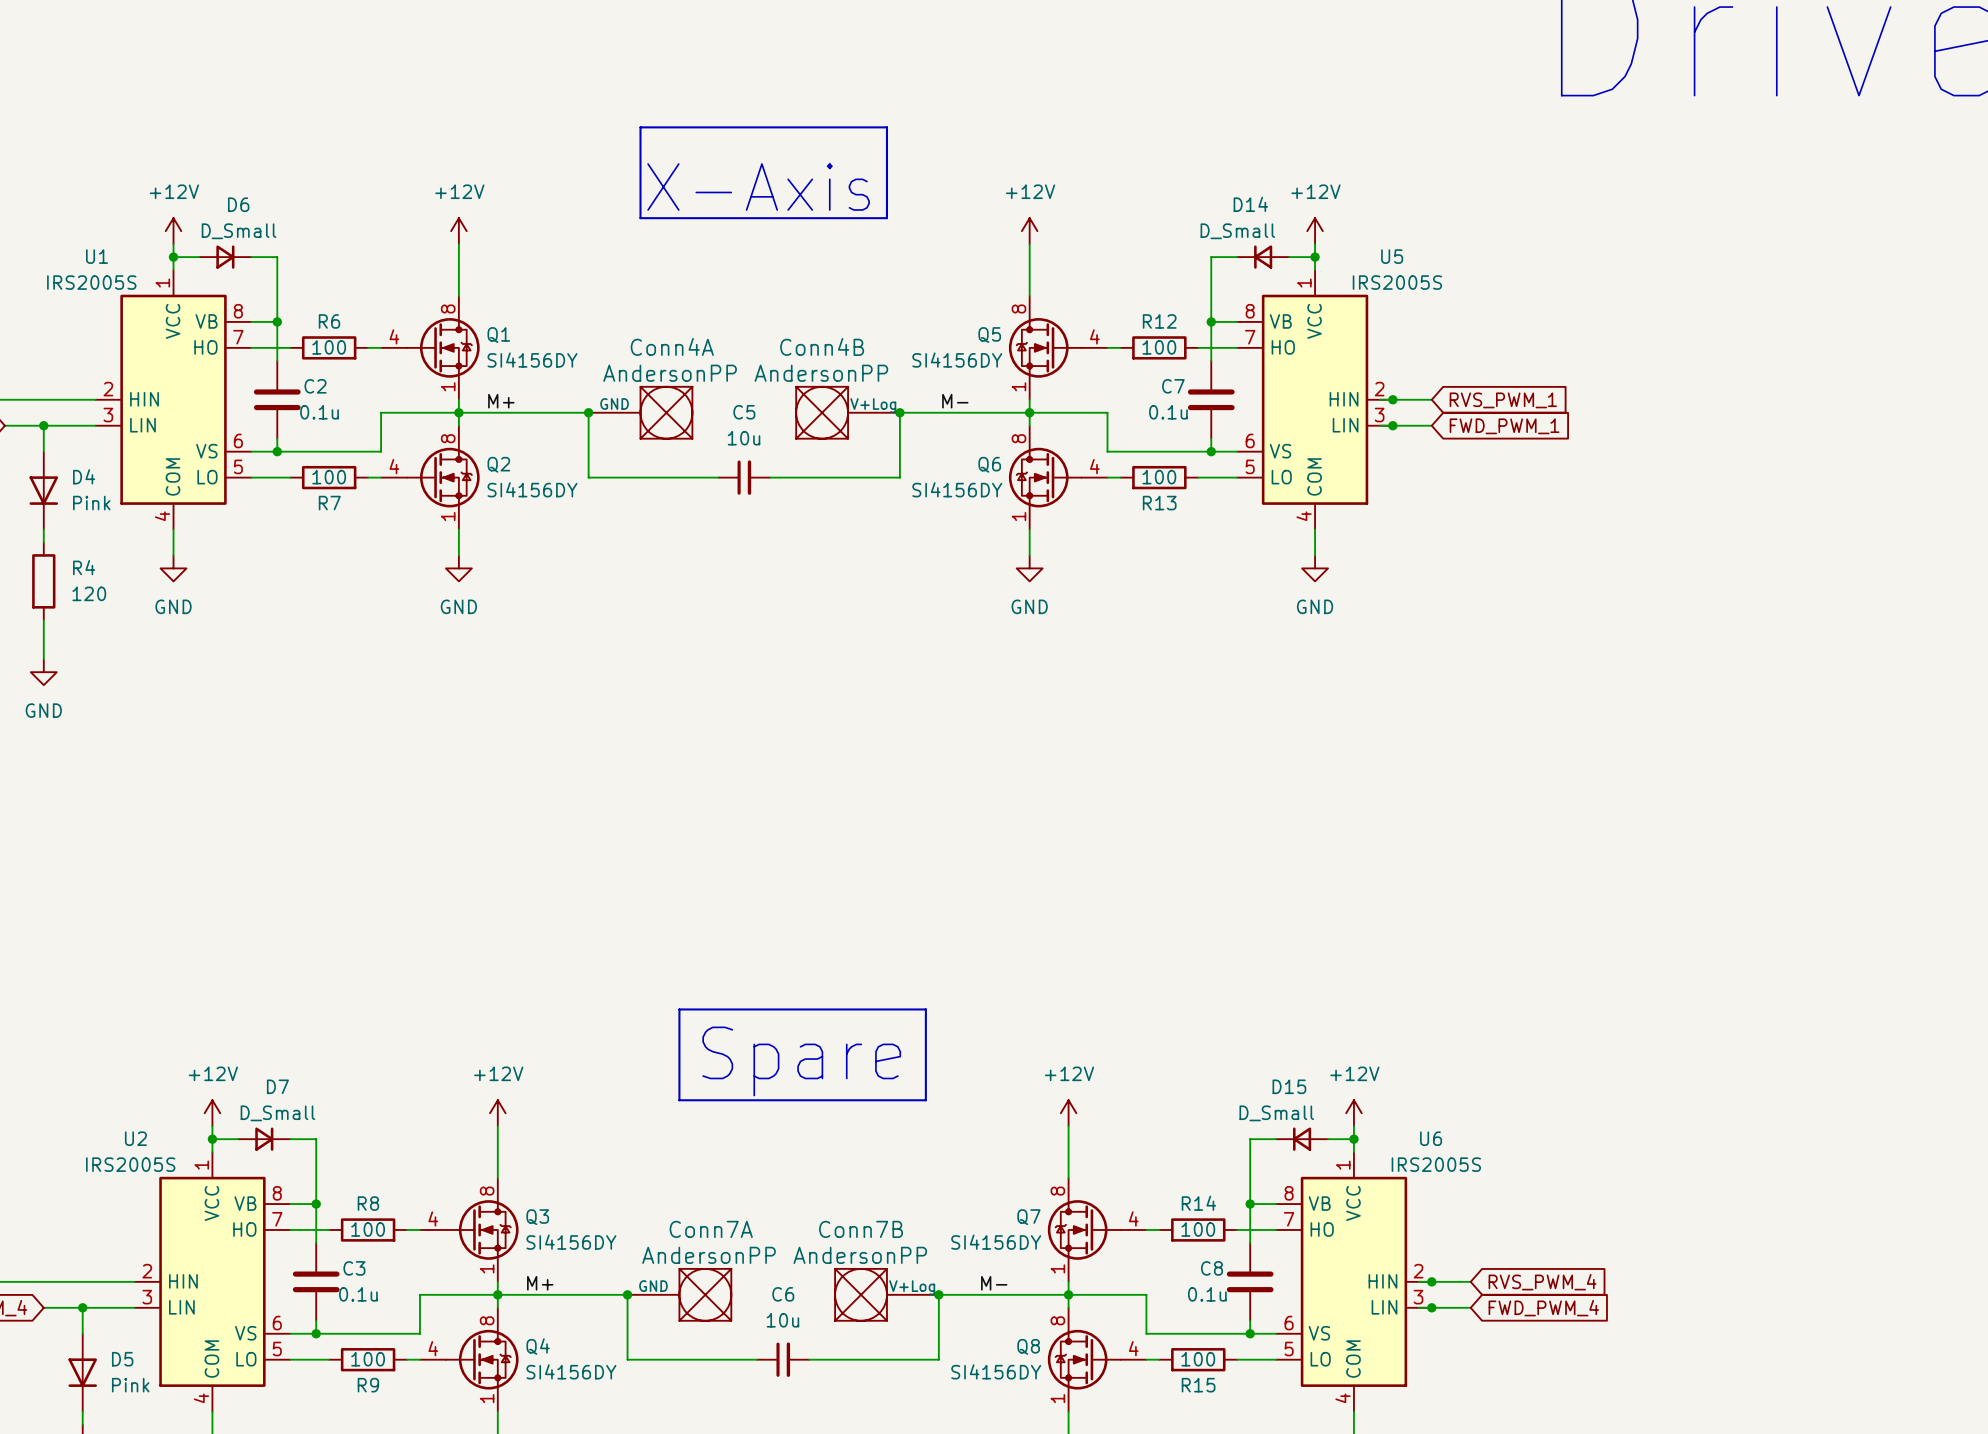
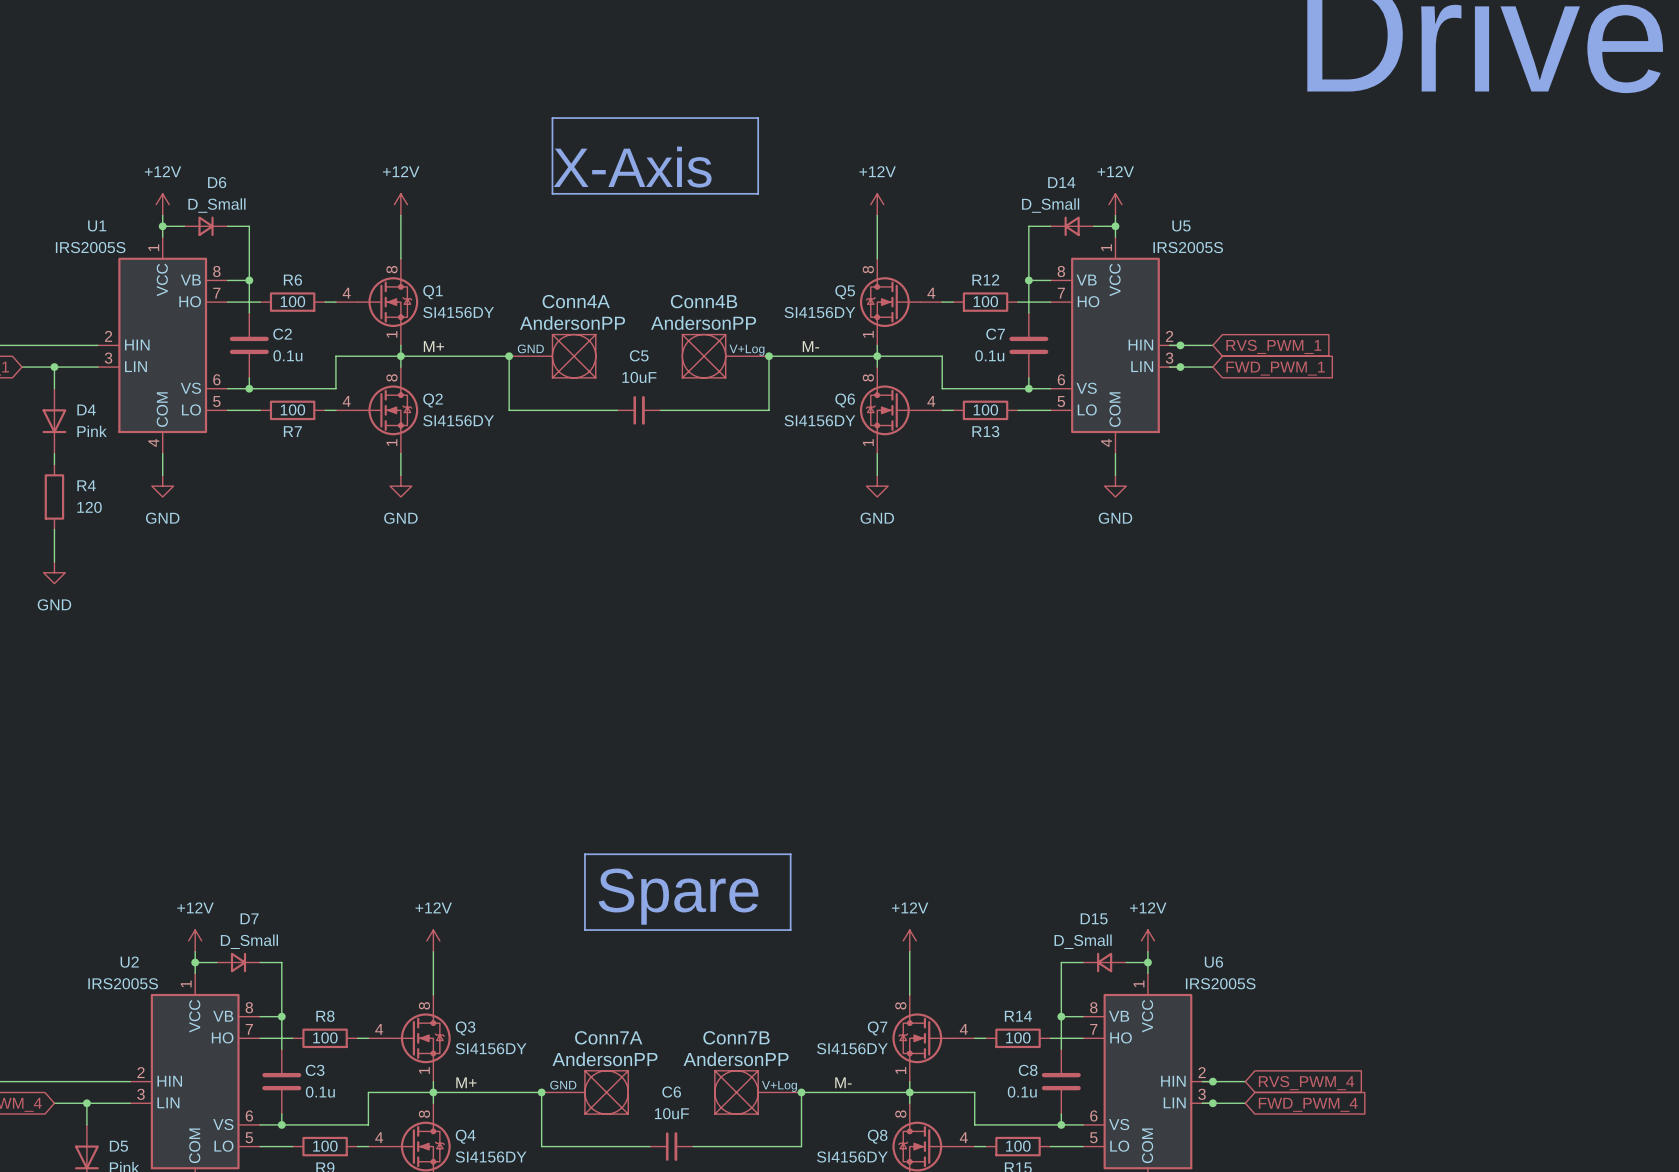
C5 value: 10u (744, 438) -> 10uF (639, 377)
C6 value: 10u (782, 1320) -> 10uF (671, 1113)

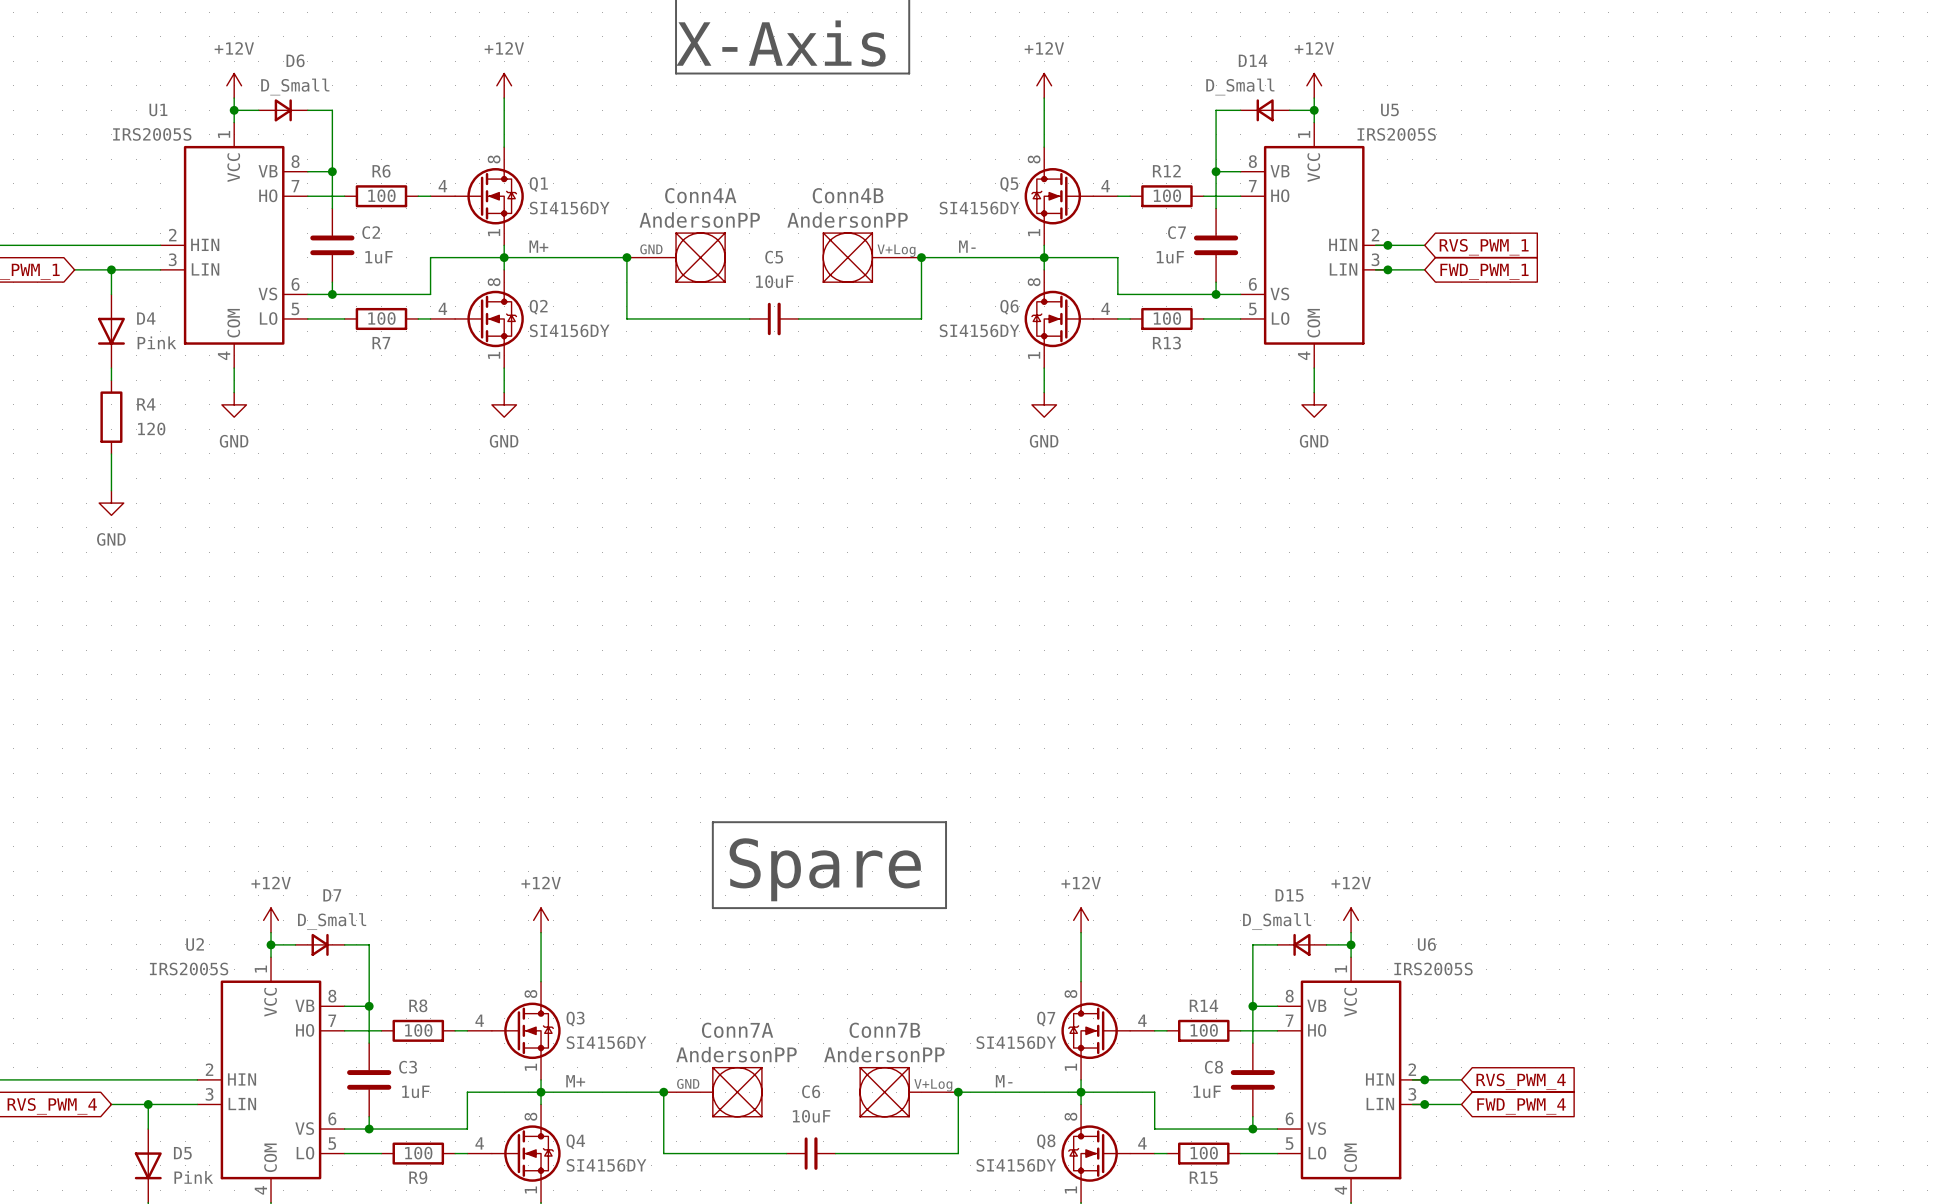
C2 value: 0.1u (287, 355) -> 1uF (379, 257)
C7 value: 0.1u (989, 355) -> 1uF (1170, 257)
C3 value: 0.1u (320, 1092) -> 1uF (415, 1091)
C8 value: 0.1u (1022, 1092) -> 1uF (1207, 1091)

